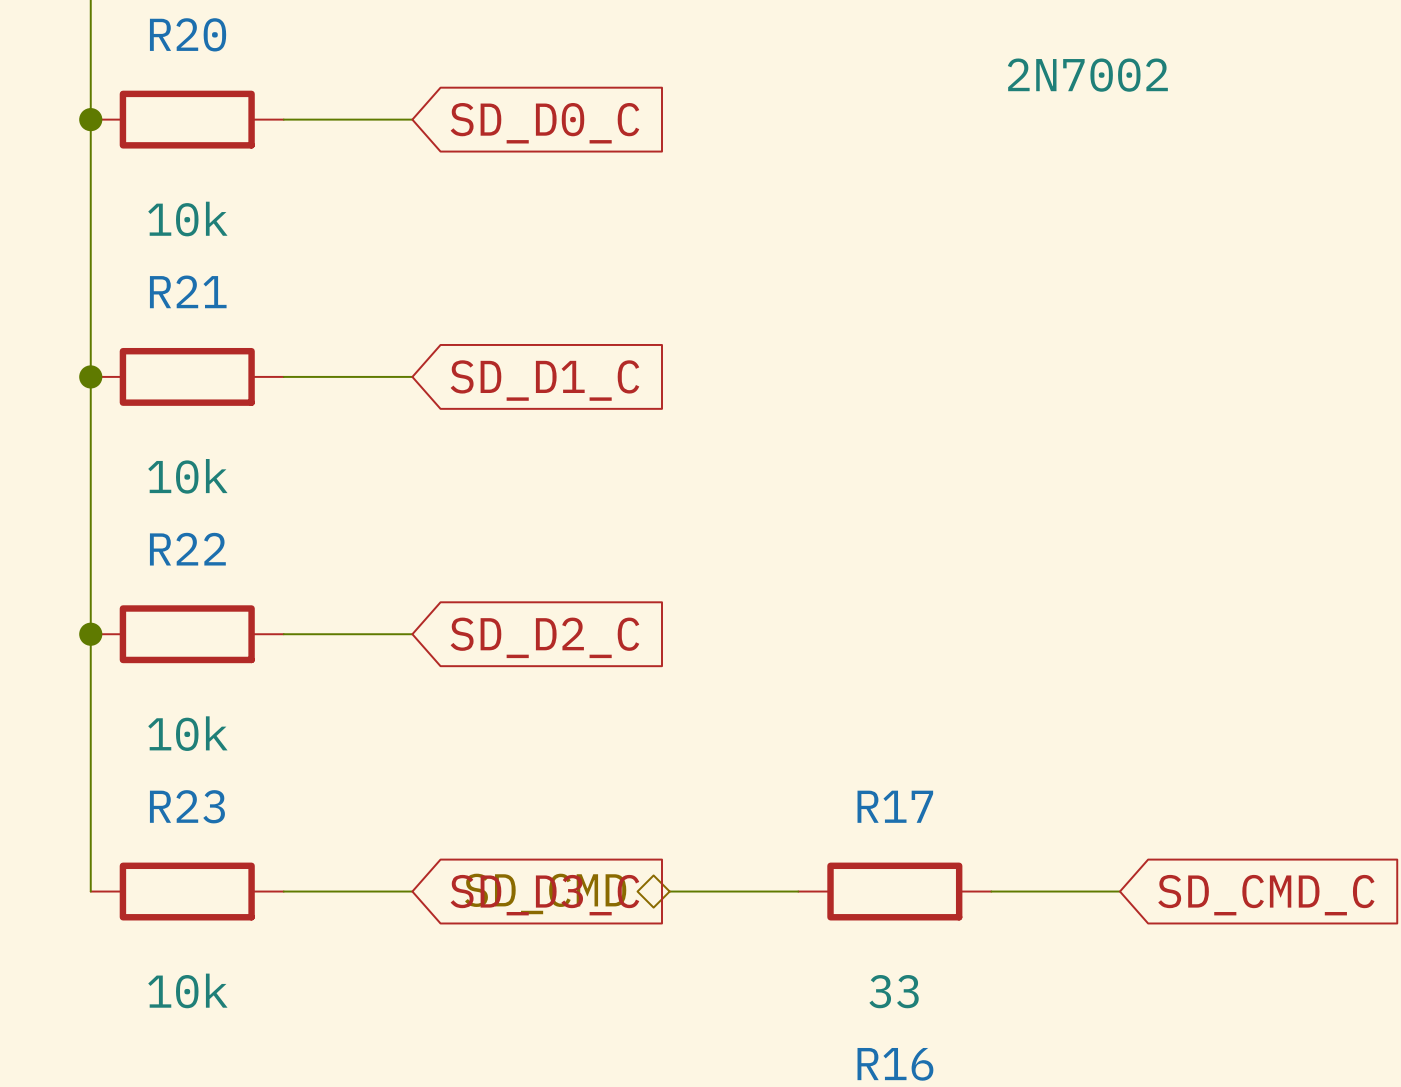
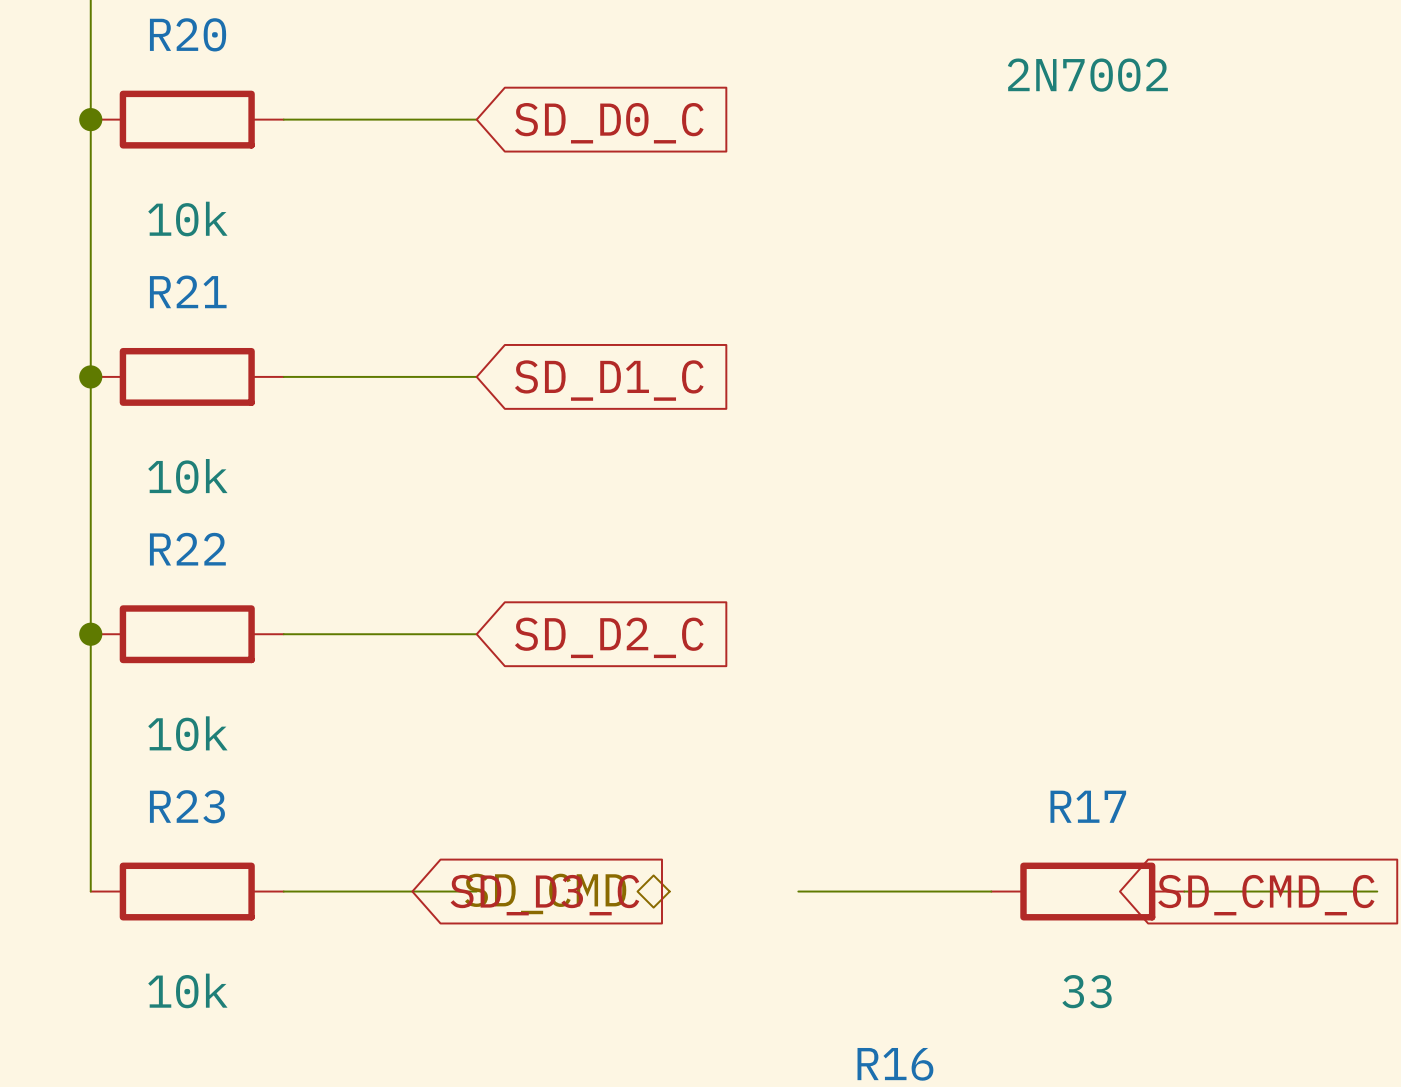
wire: none -> (412, 119) (476, 119)
global label position: SD_D0_C (544, 123) -> SD_D0_C (609, 123)
wire: none -> (412, 376) (476, 376)
global label position: SD_D1_C (544, 380) -> SD_D1_C (609, 380)
wire: none -> (412, 634) (476, 634)
global label position: SD_D2_C (544, 637) -> SD_D2_C (609, 637)
wire: none -> (412, 891) (476, 891)
wire: (669, 891) (798, 891) -> none
R17 position: (894, 891) -> (1087, 891)
wire: (991, 891) (1119, 891) -> (991, 891) (798, 891)
wire: none -> (1184, 891) (1377, 891)

